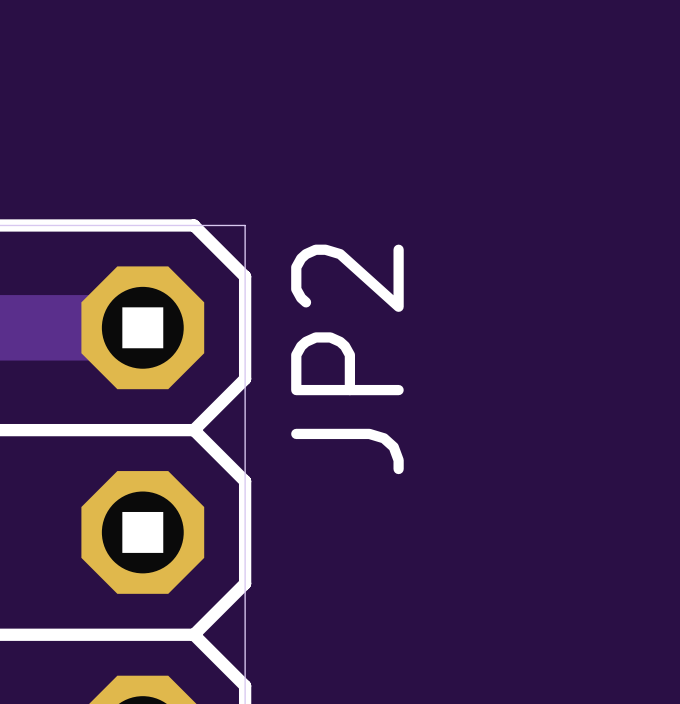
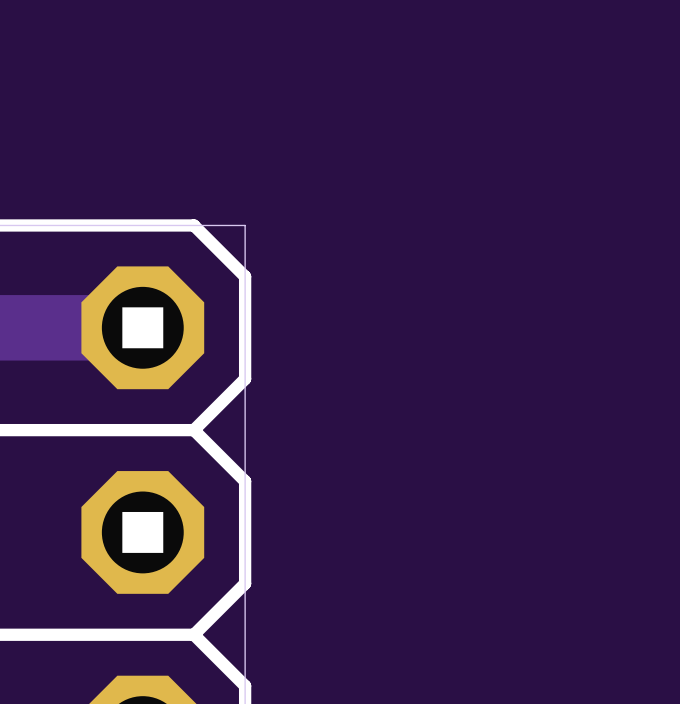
JP2 name: JP2 (347, 359) -> none

